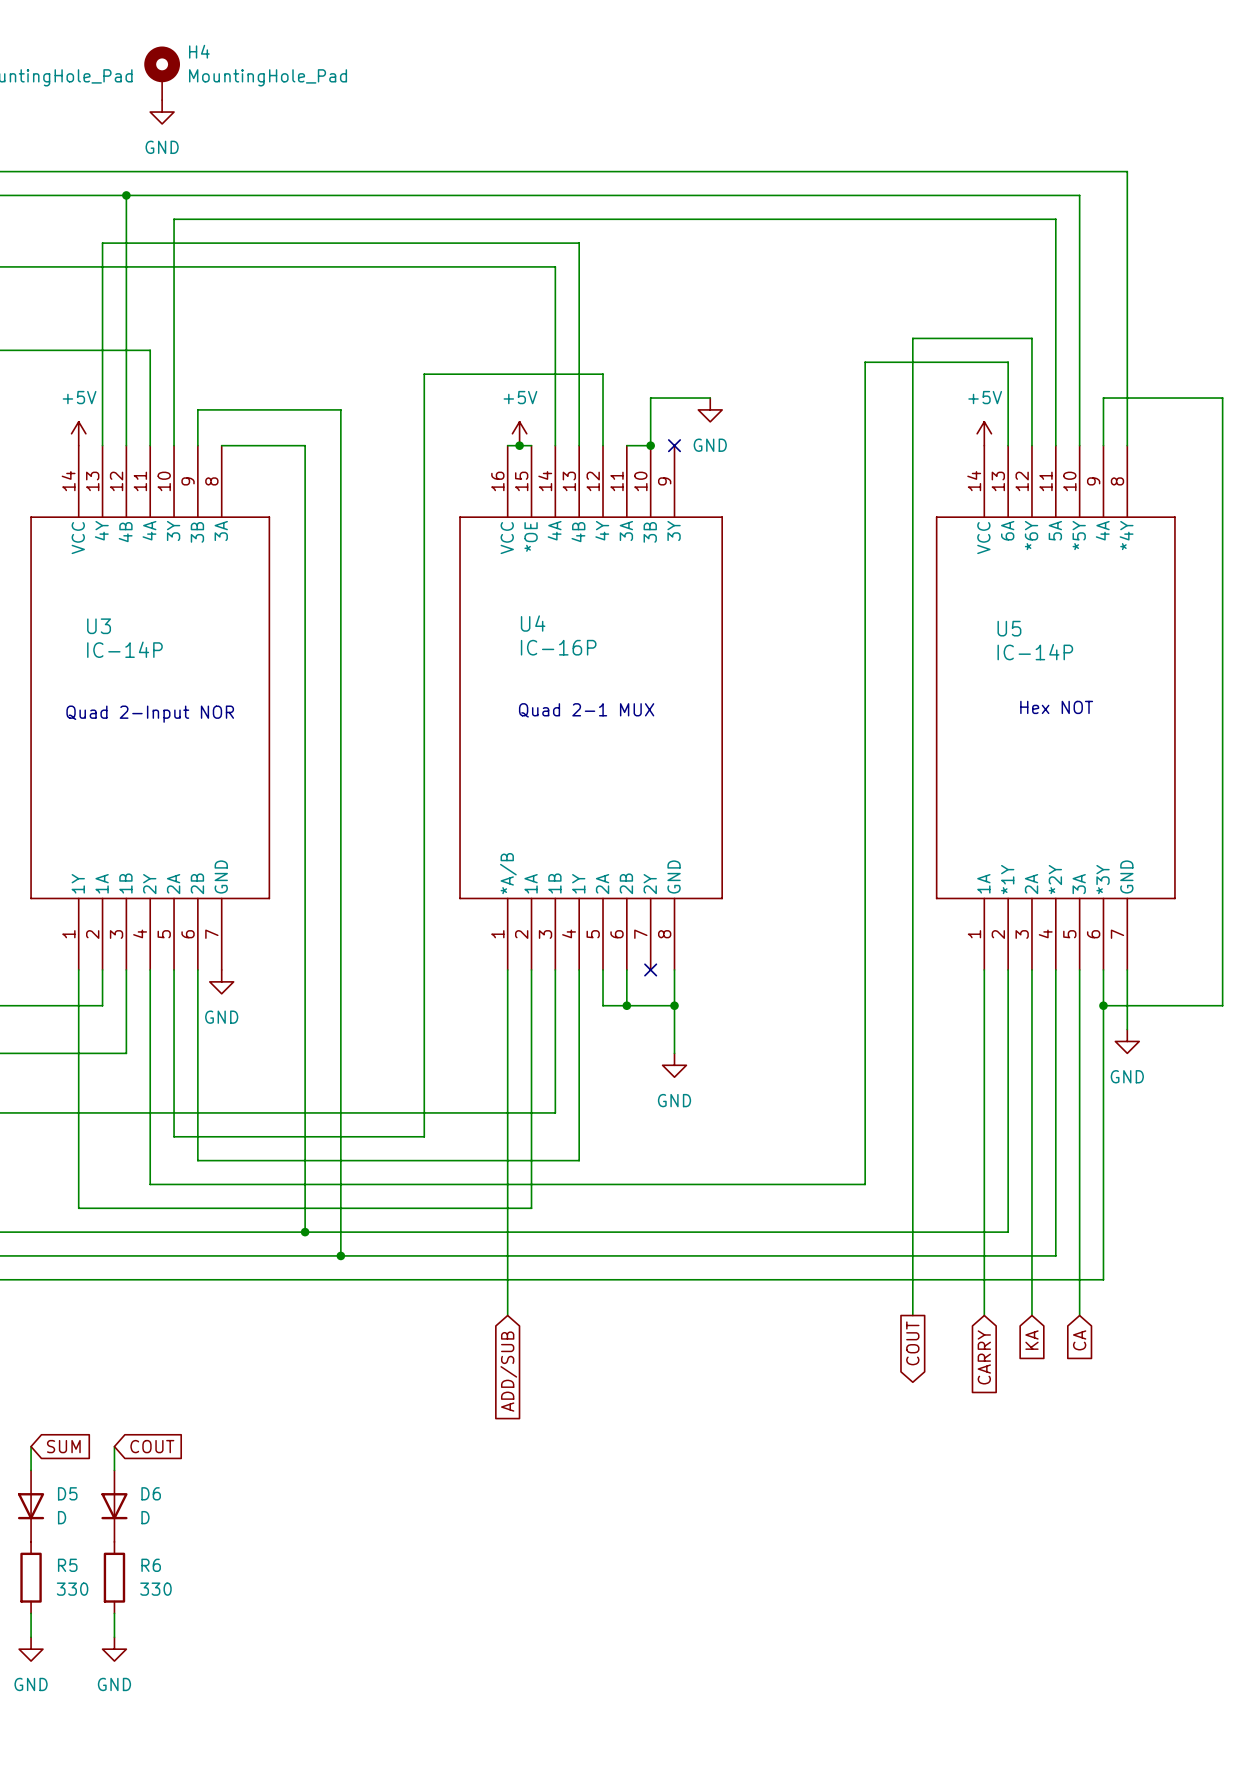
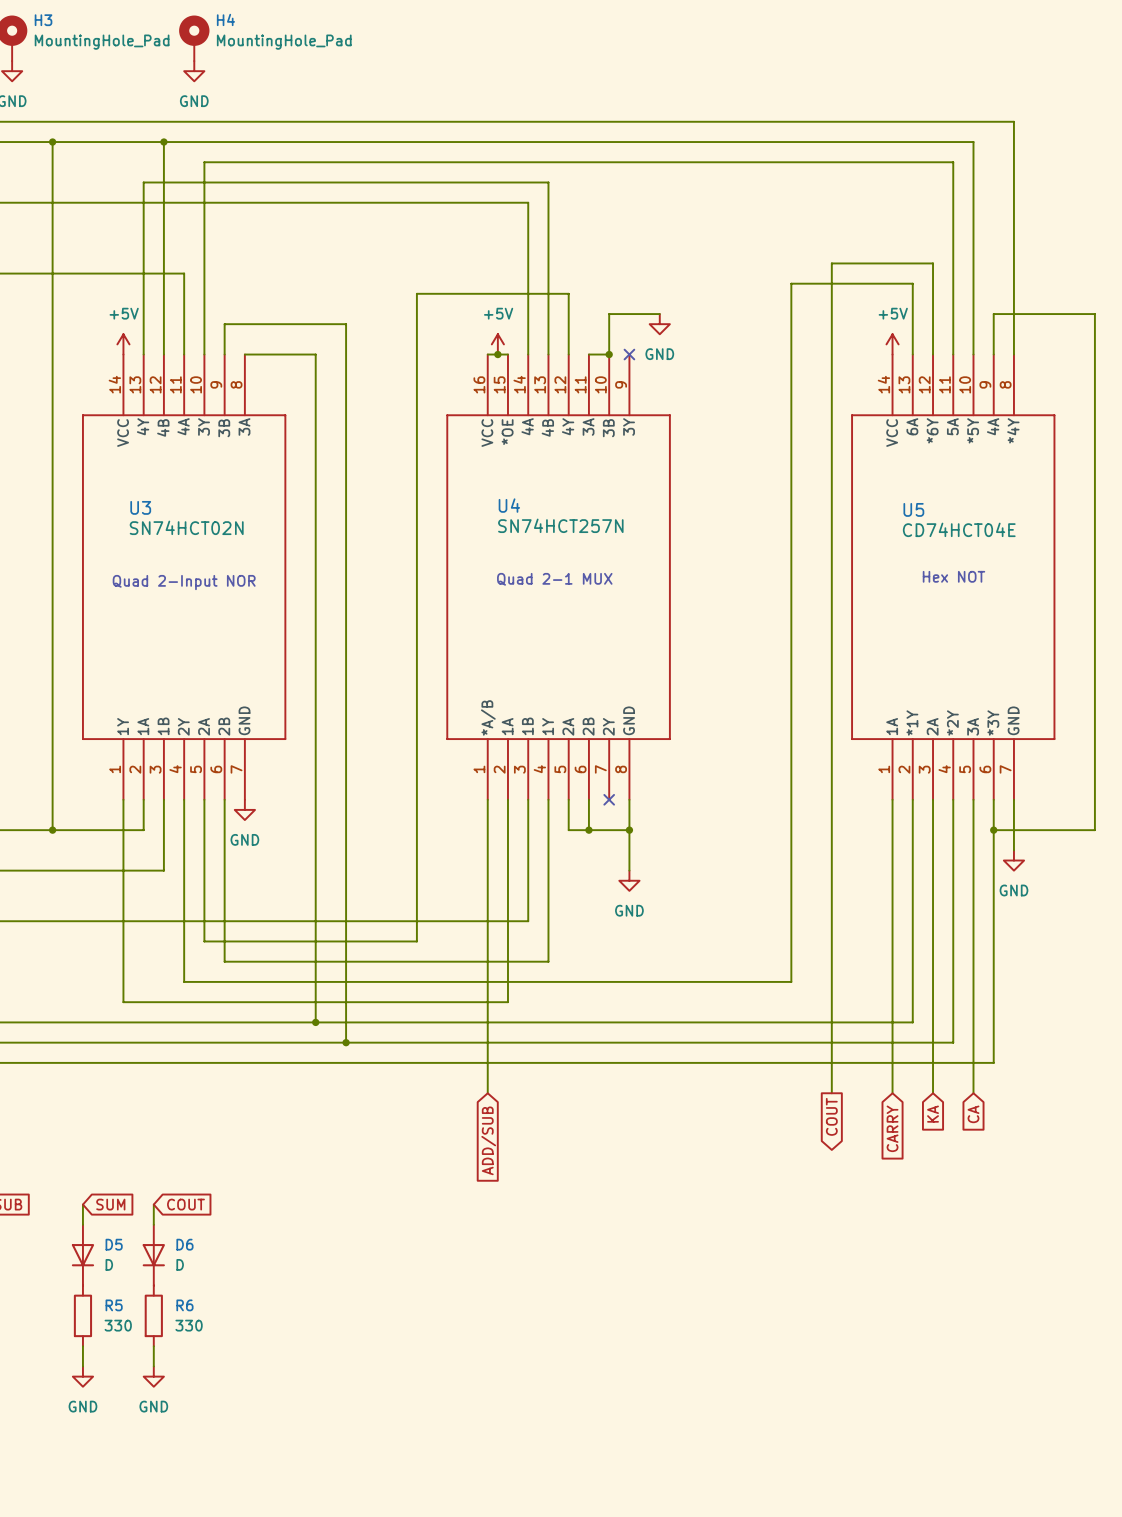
U4 value: IC-16P (558, 647) -> SN74HCT257N (560, 525)
U3 value: IC-14P (124, 649) -> SN74HCT02N (186, 527)
U5 value: IC-14P (1035, 652) -> CD74HCT04E (959, 529)

